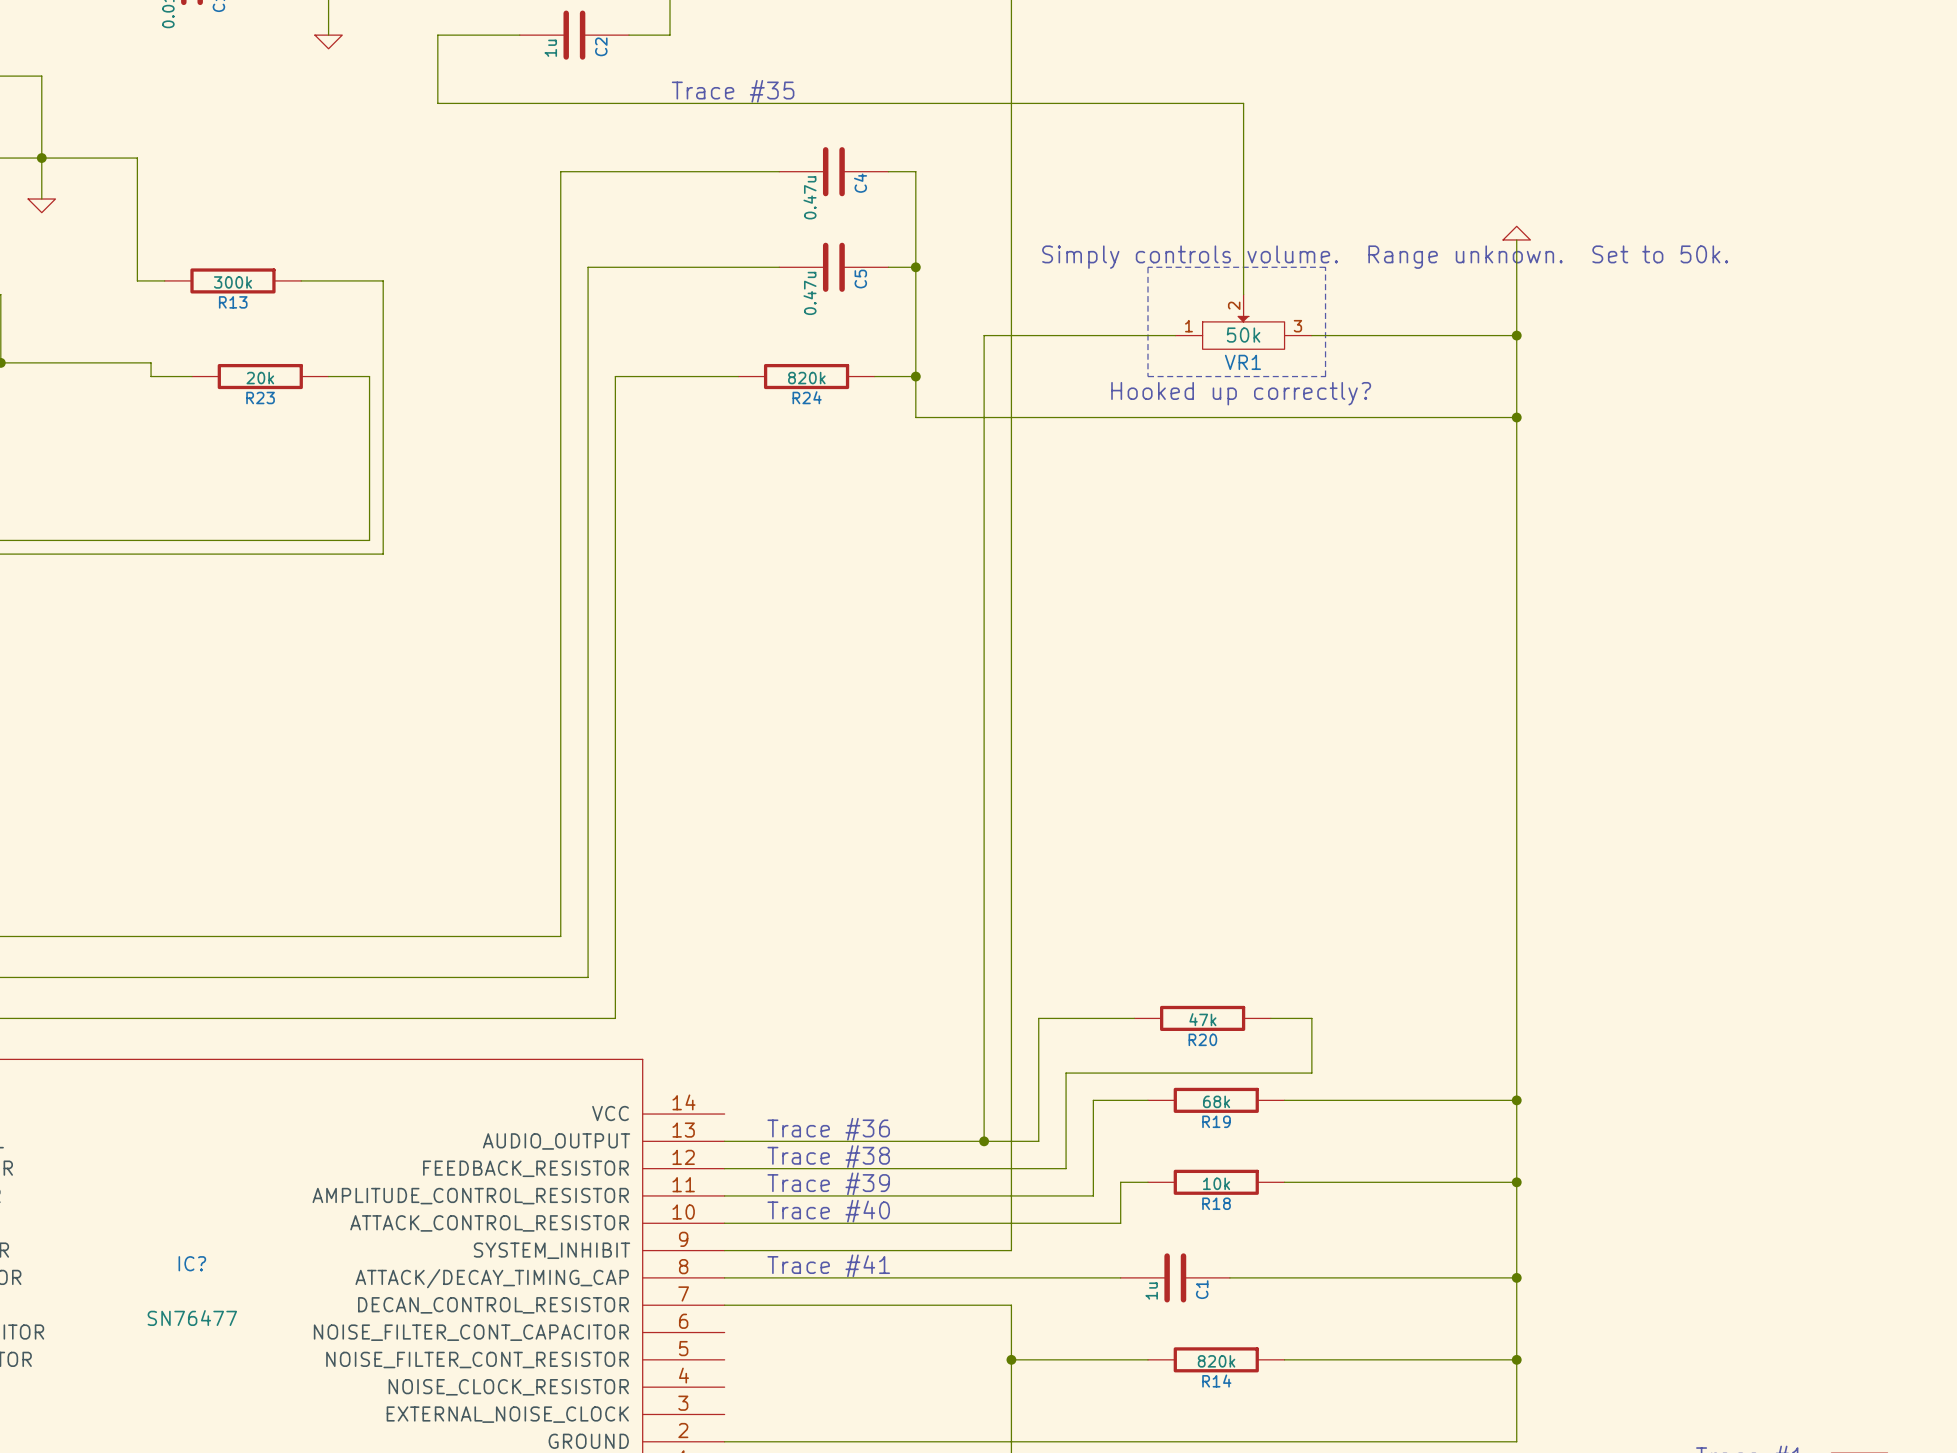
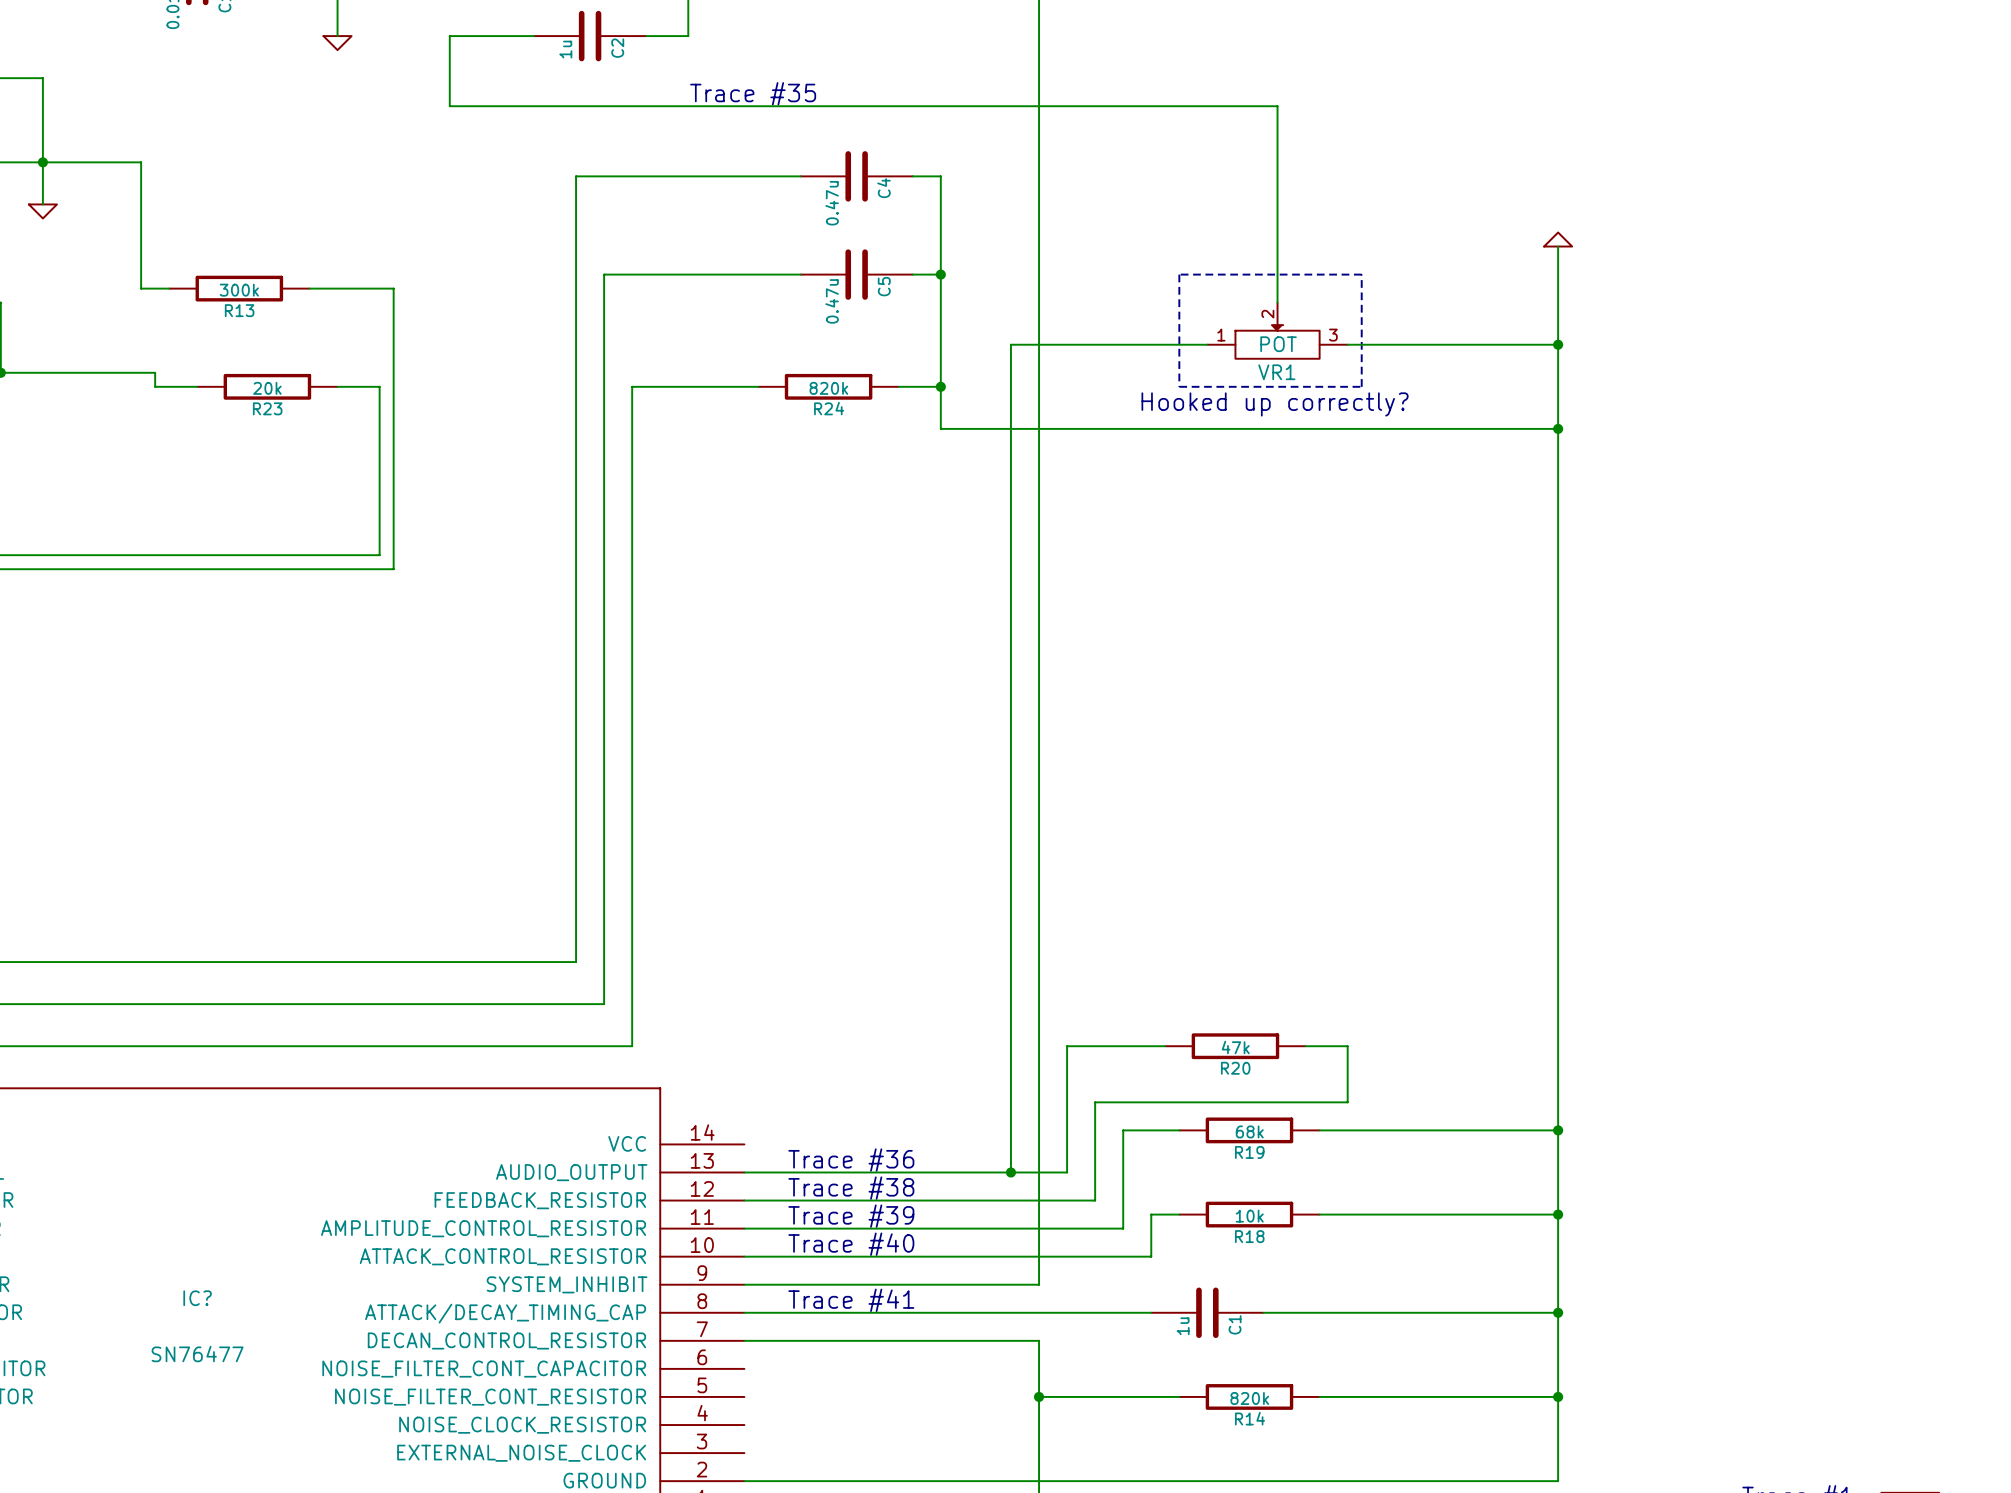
text: Simply controls volume. Range unknown. Set to 50k. (1385, 257) -> none
VR1 value: 50k (1243, 335) -> POT (1278, 344)

